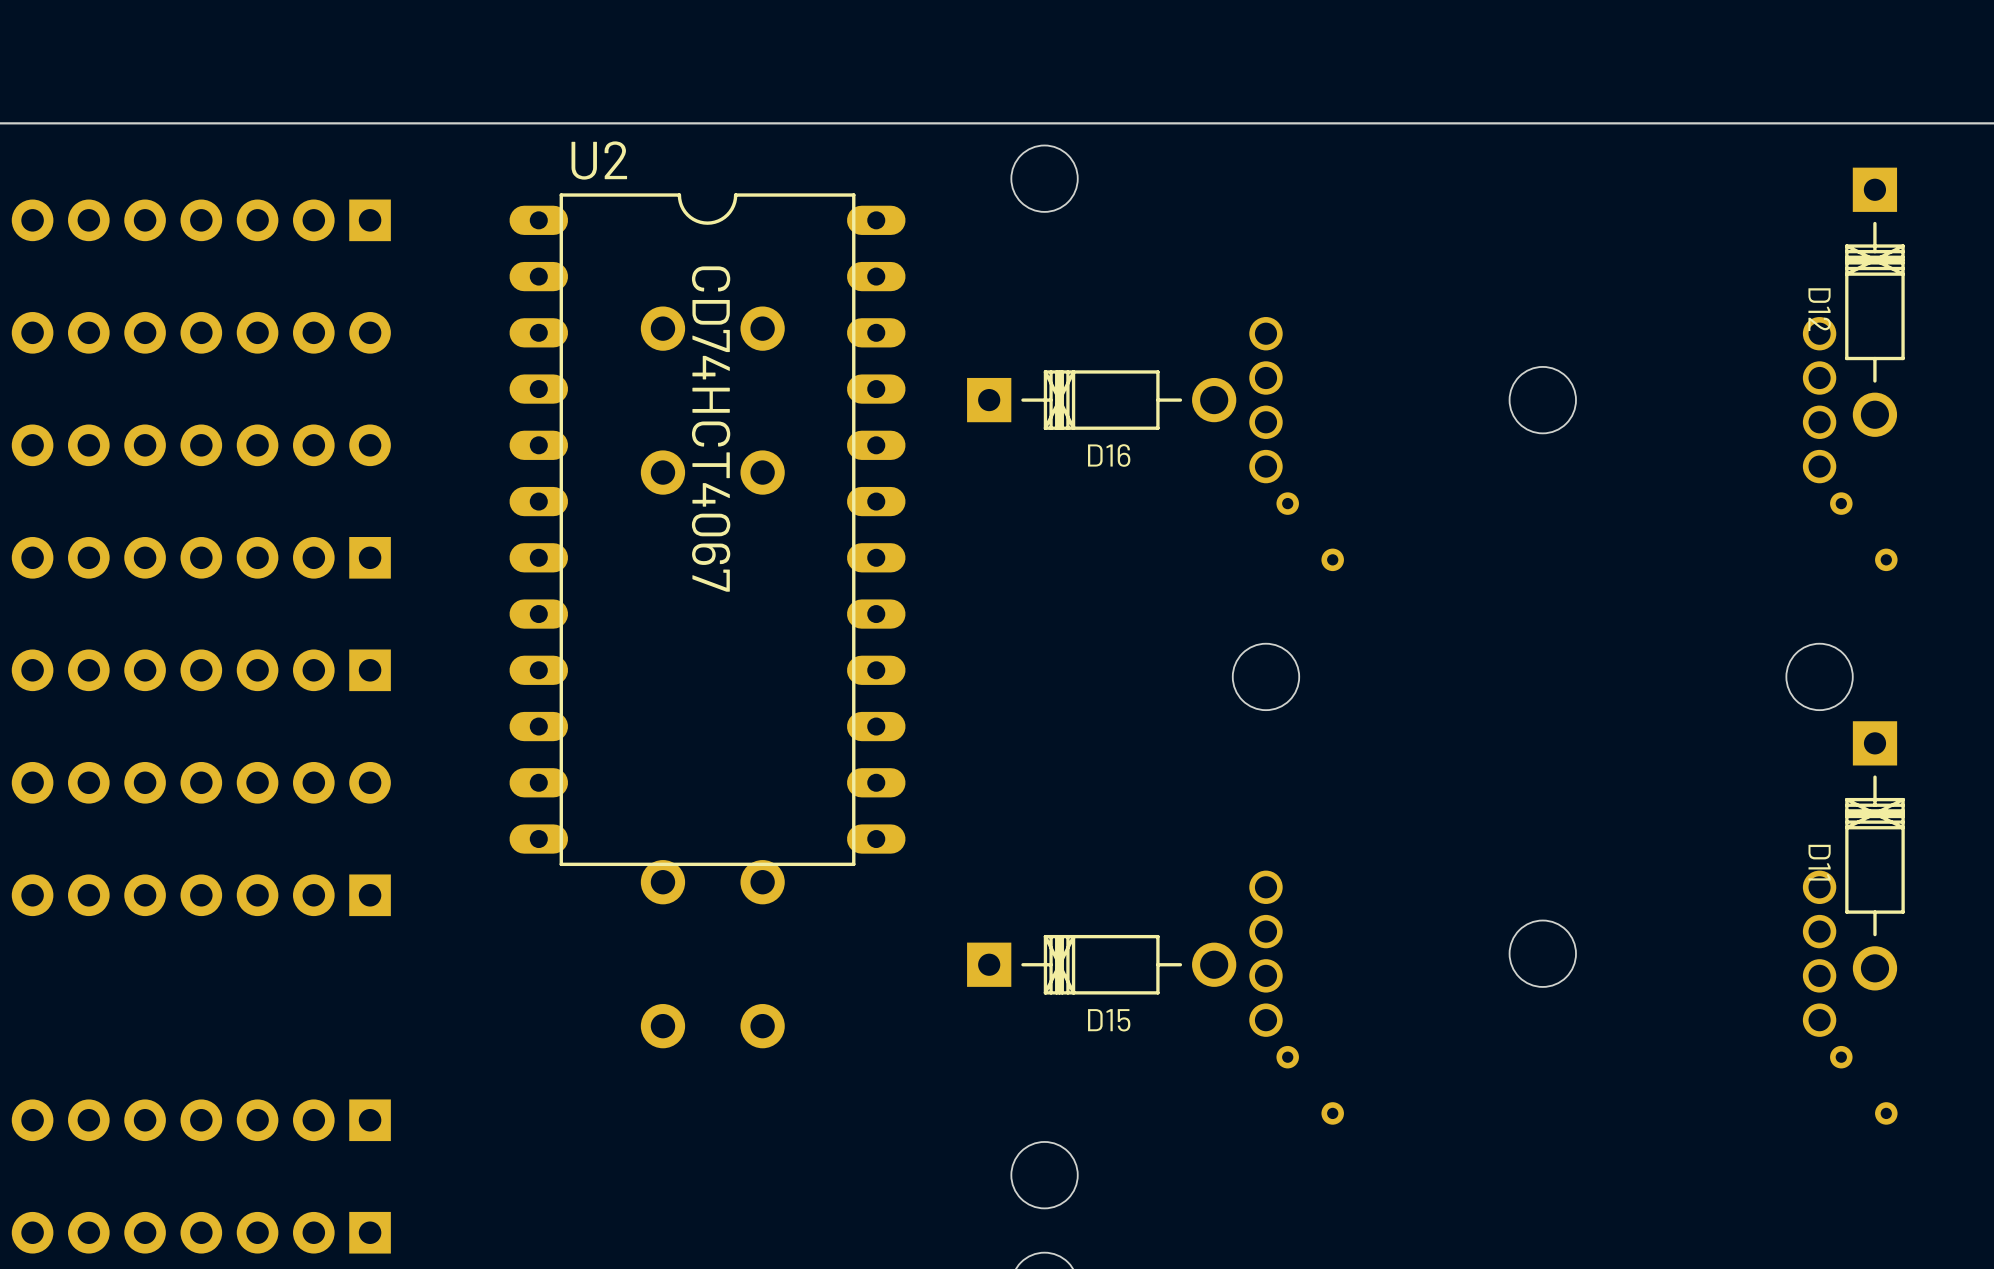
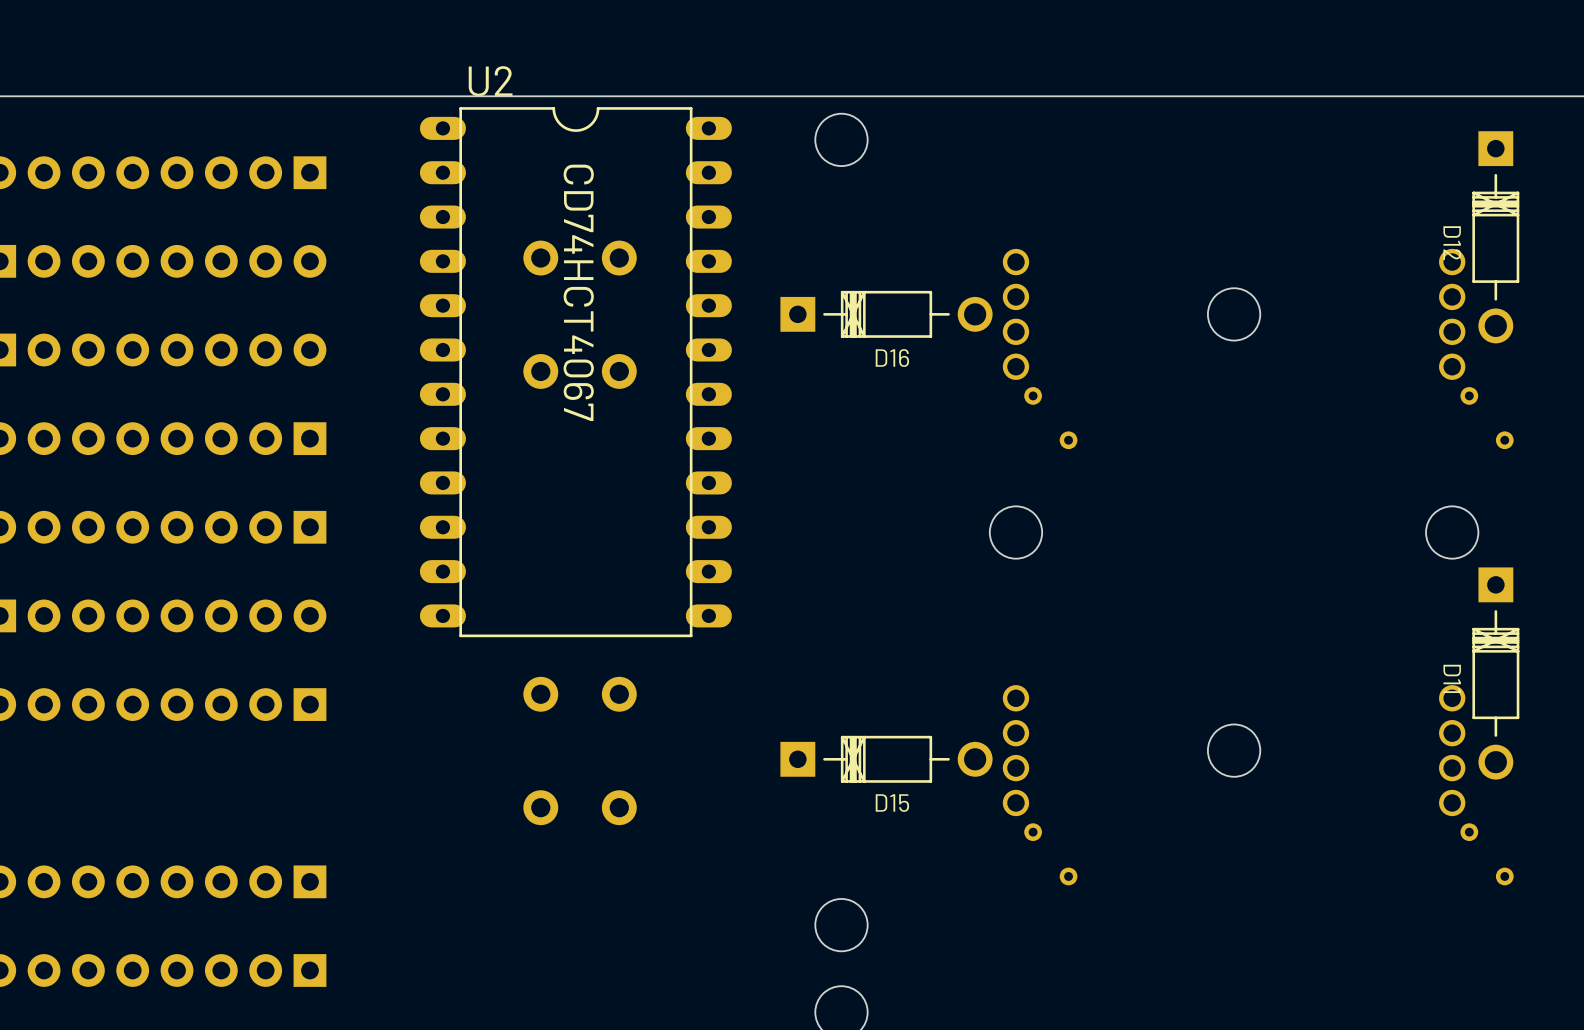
U2 position: (707, 529) -> (575, 372)

